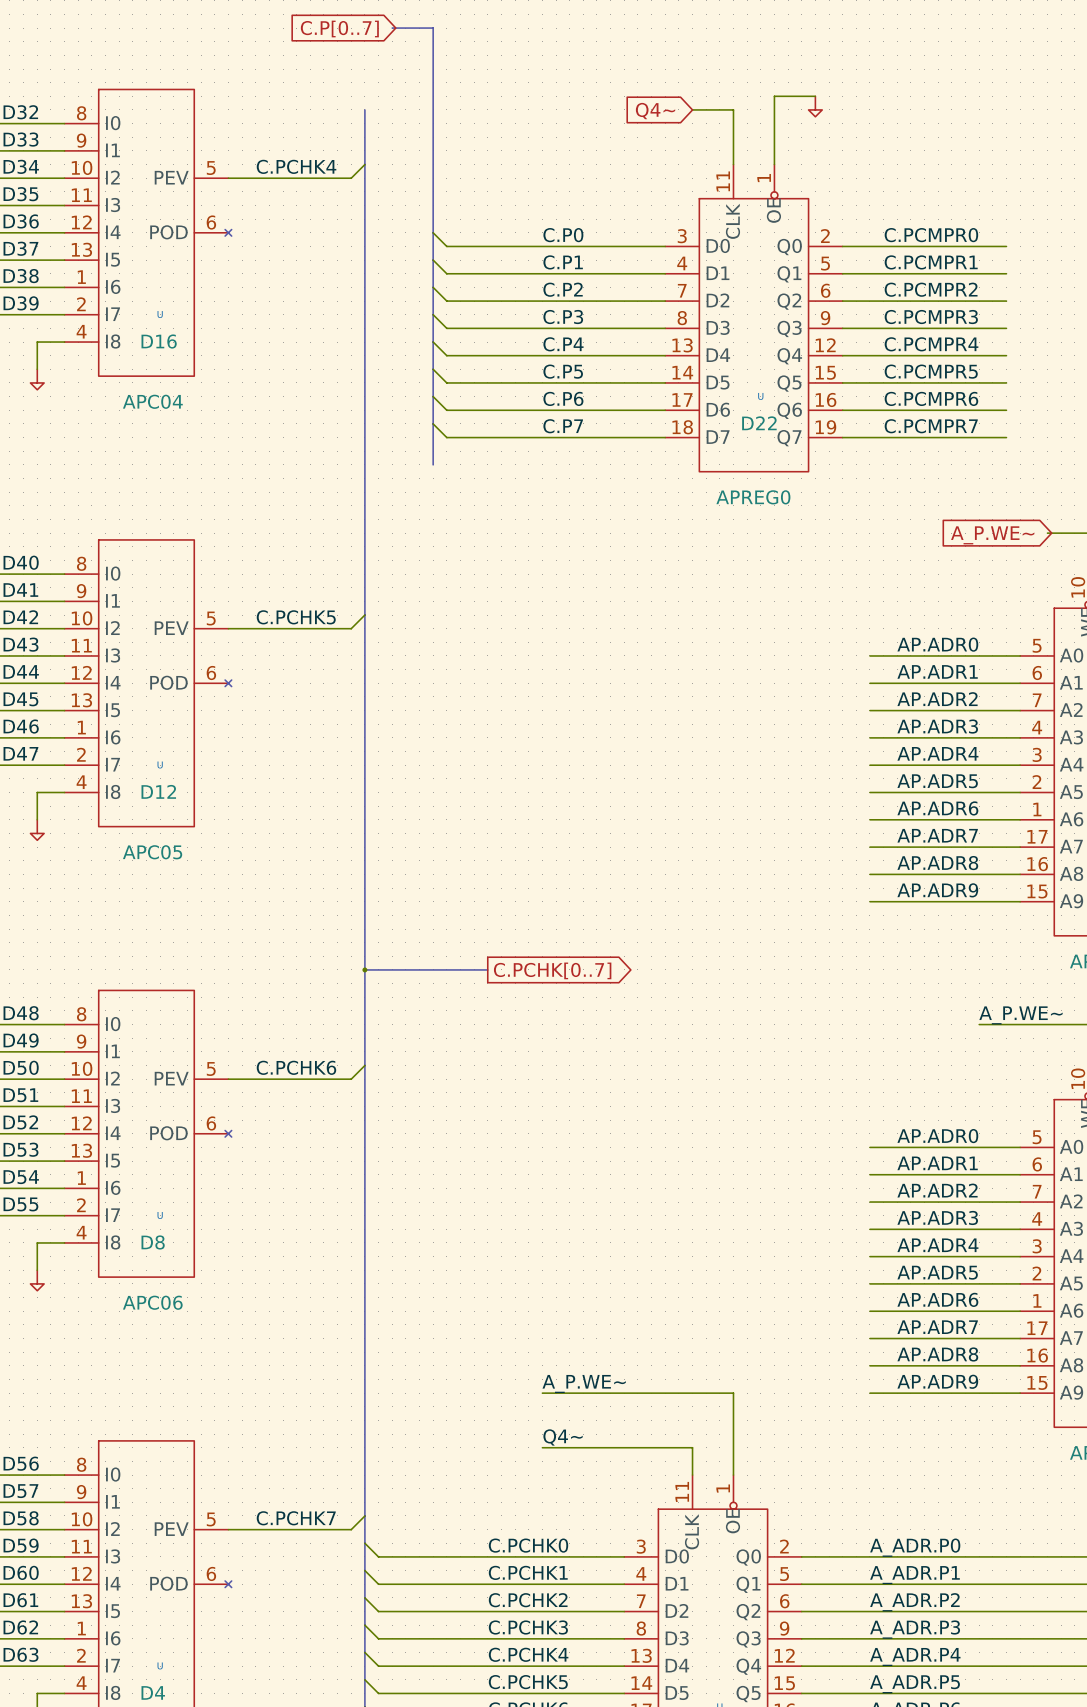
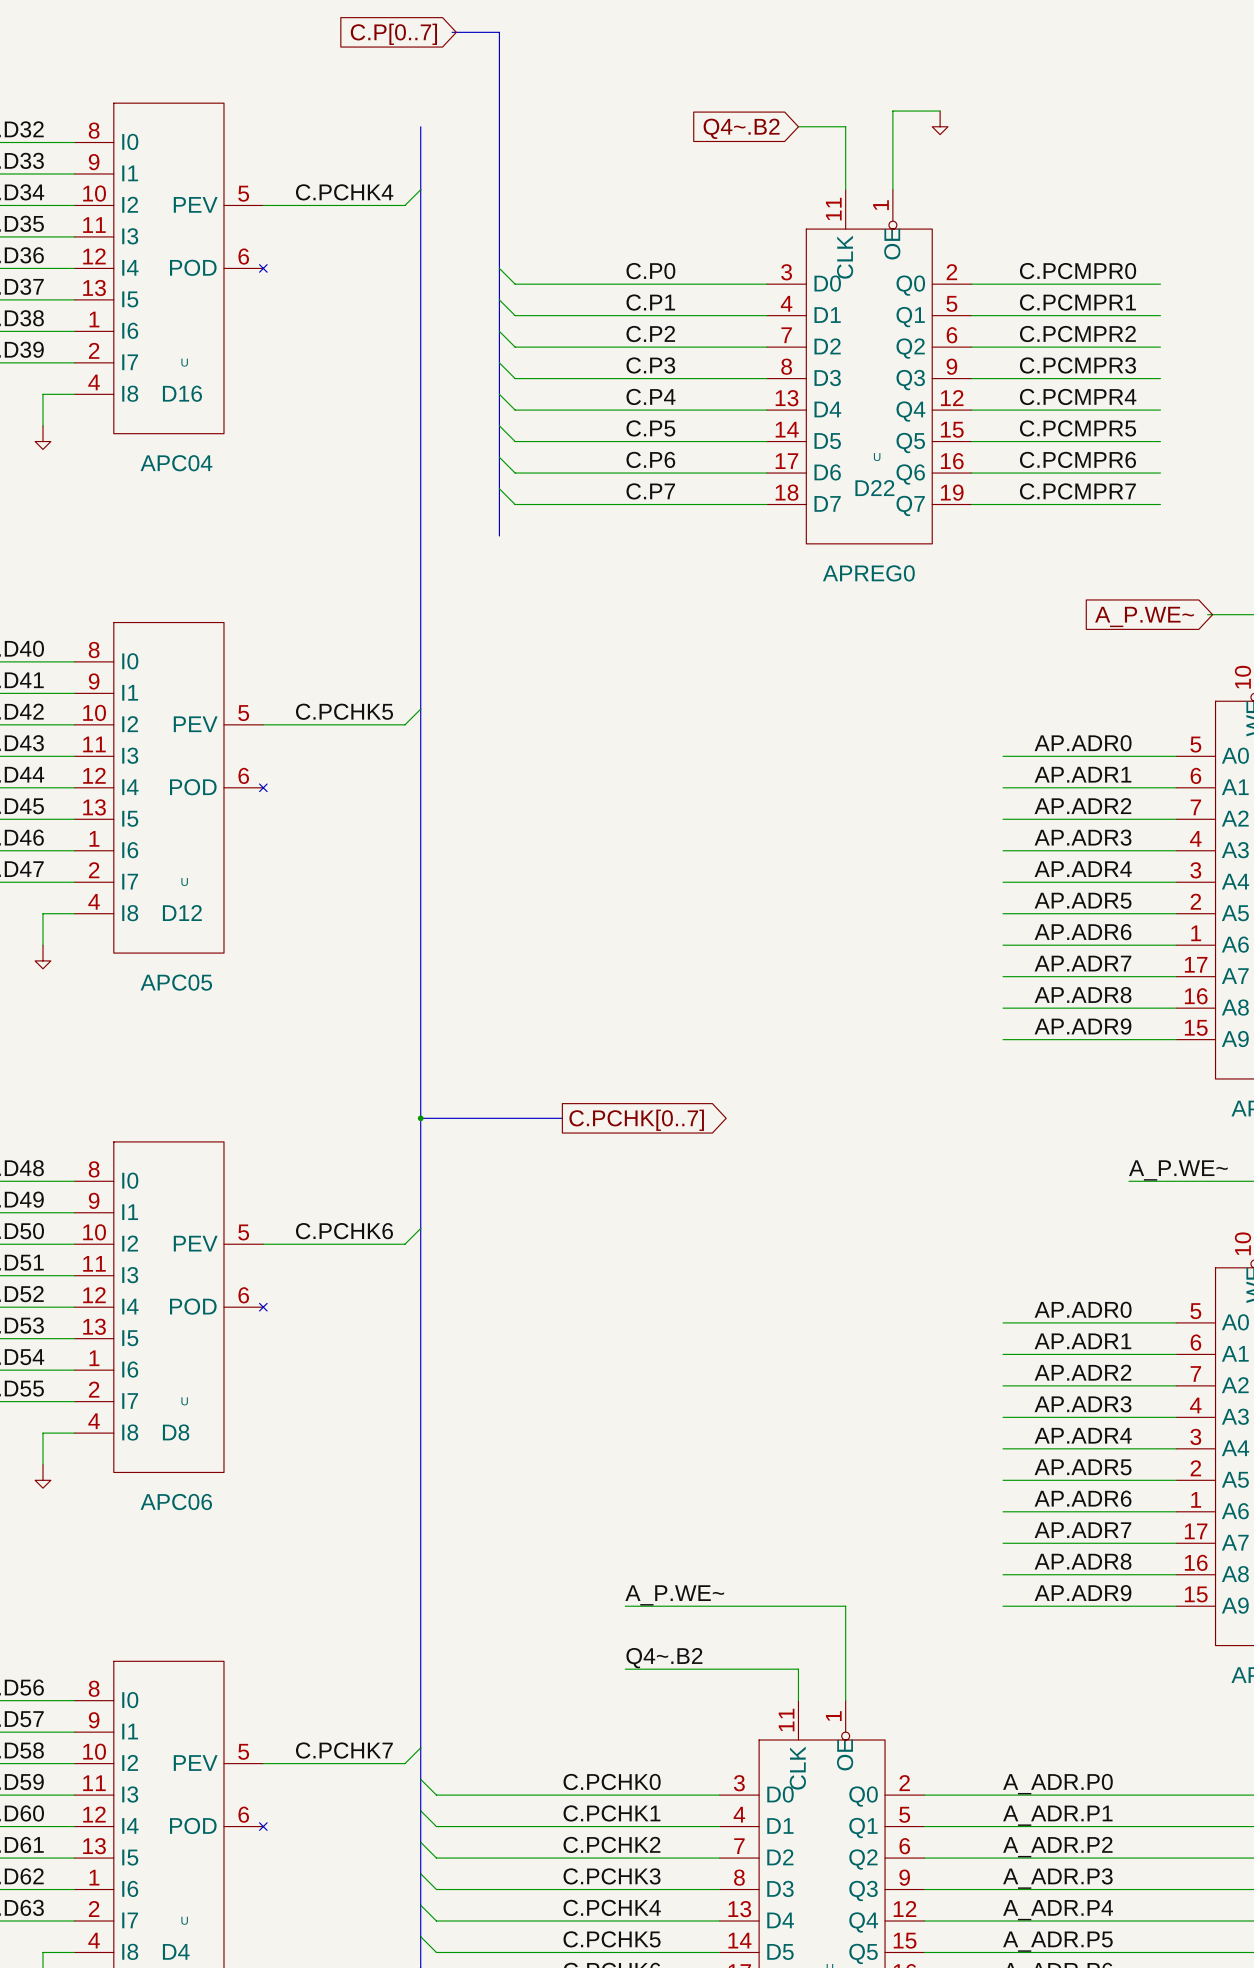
global label: Q4~ (655, 111) -> Q4~.B2 (741, 128)
label: Q4~ (563, 1437) -> Q4~.B2 (664, 1658)

